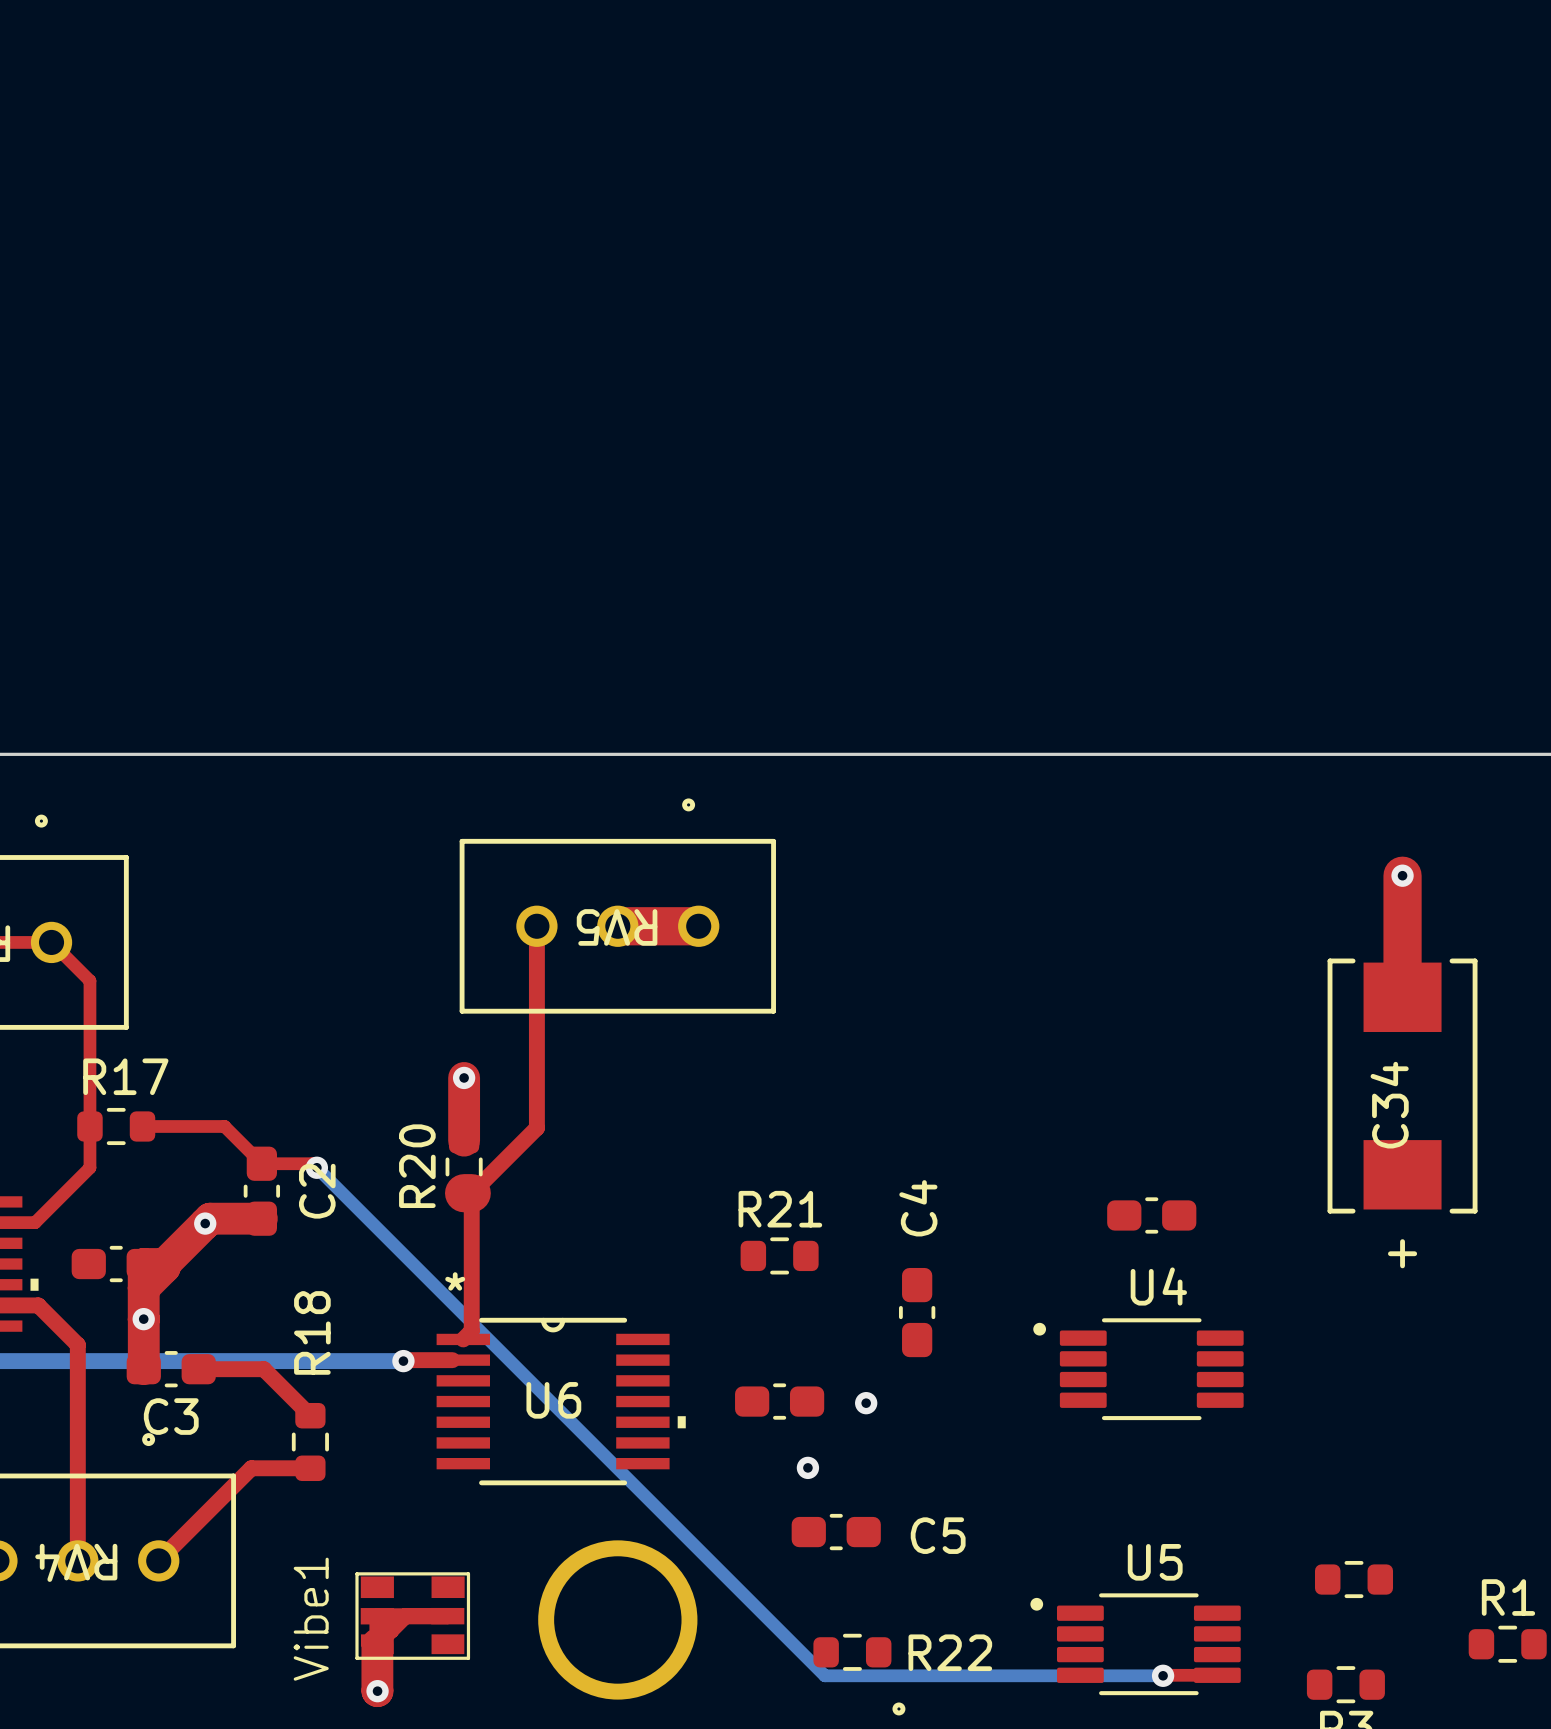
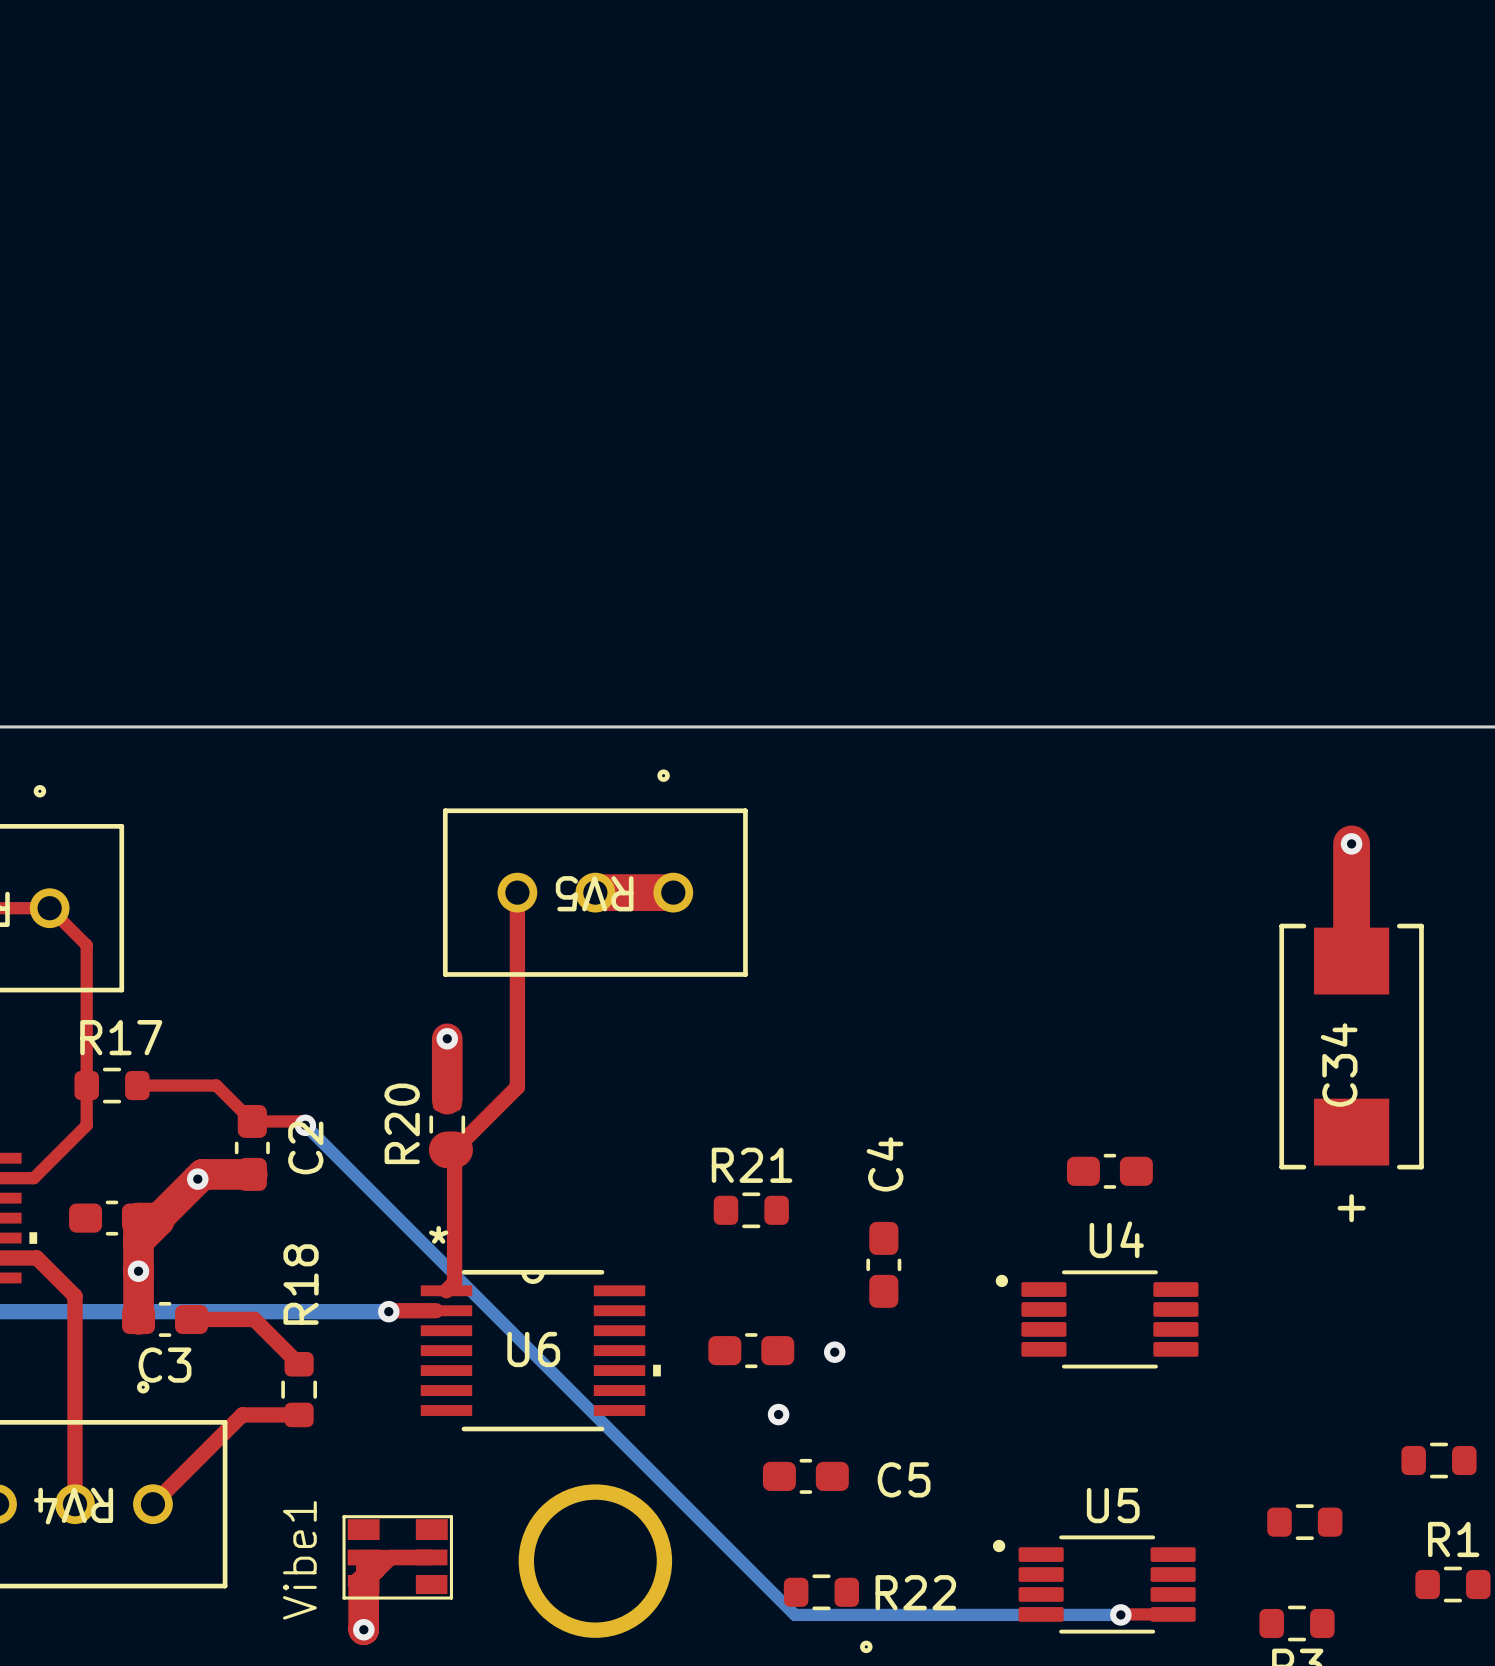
part: none -> (1439, 1460)

